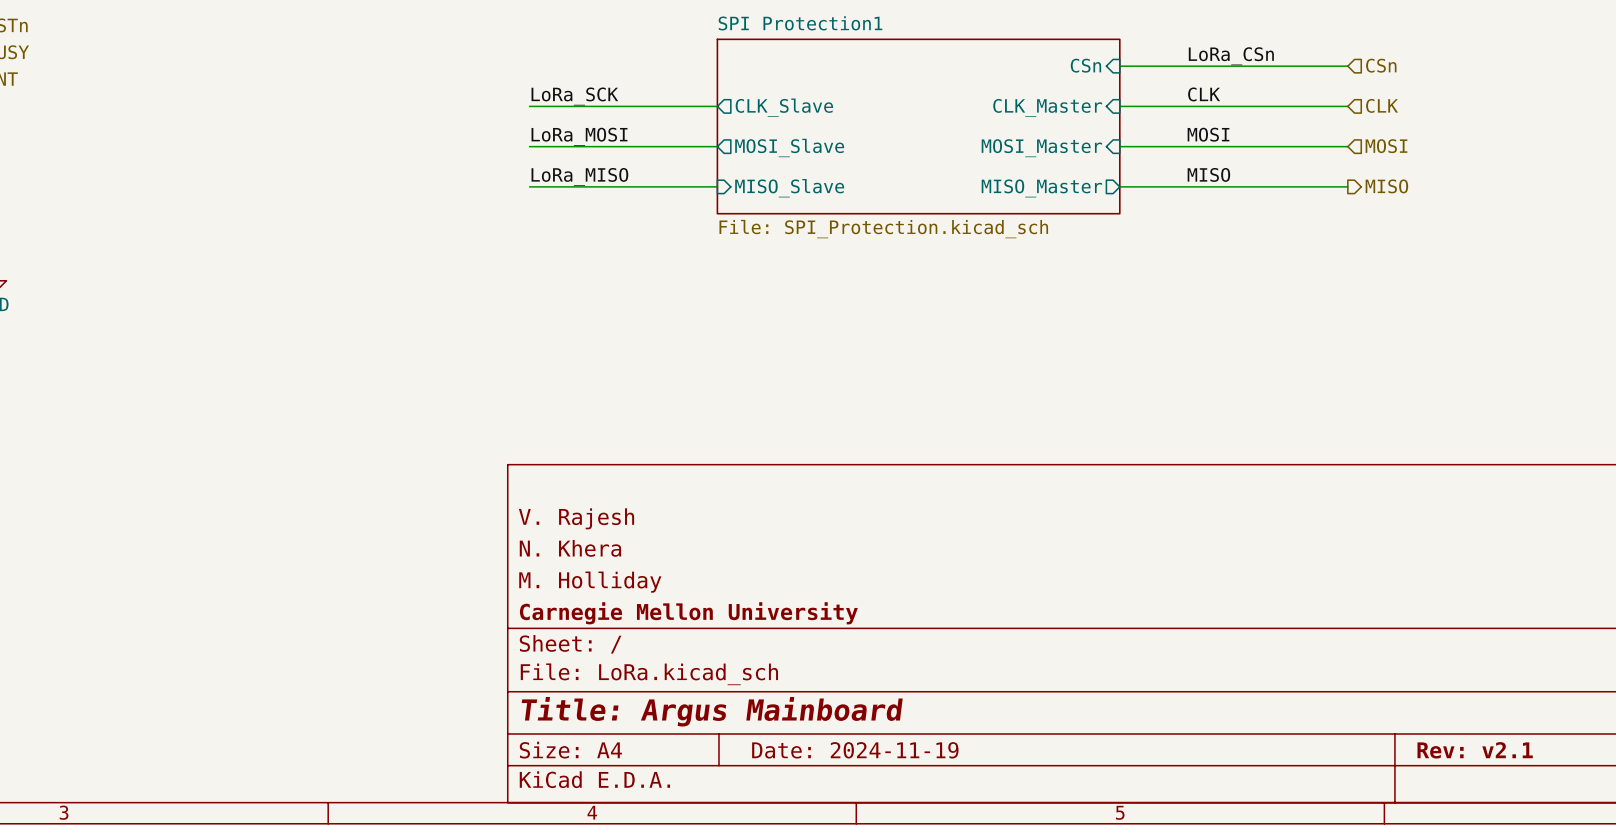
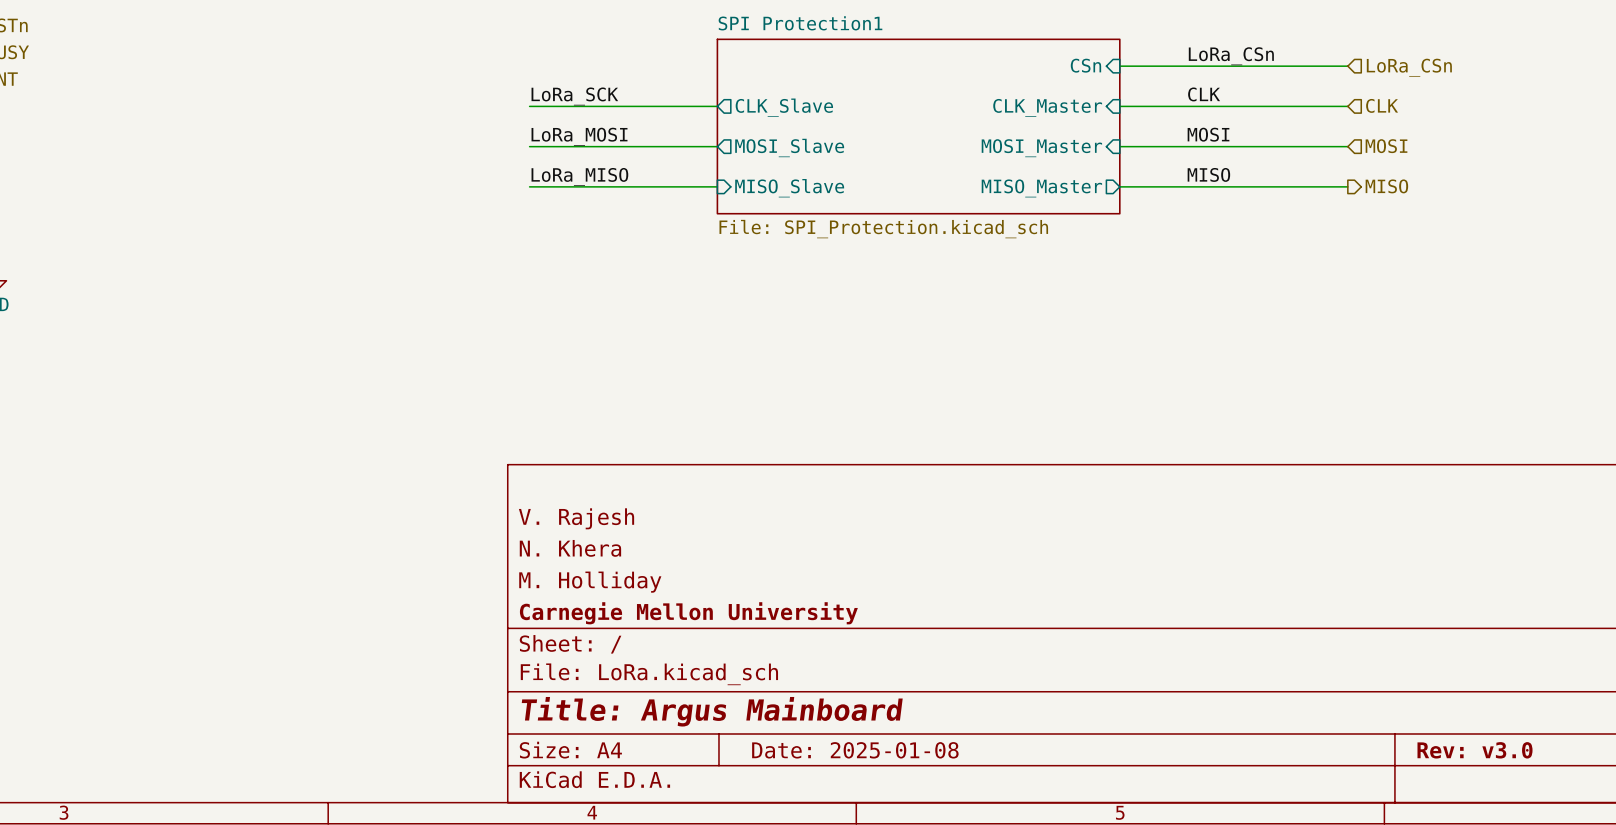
hierarchical label: CSn (1381, 65) -> LoRa_CSn (1409, 67)
title block: Date: 2024-11-19 (855, 750) -> Date: 2025-01-08 (855, 750)
title block: Rev: v2.1 (1475, 750) -> Rev: v3.0 (1475, 750)

